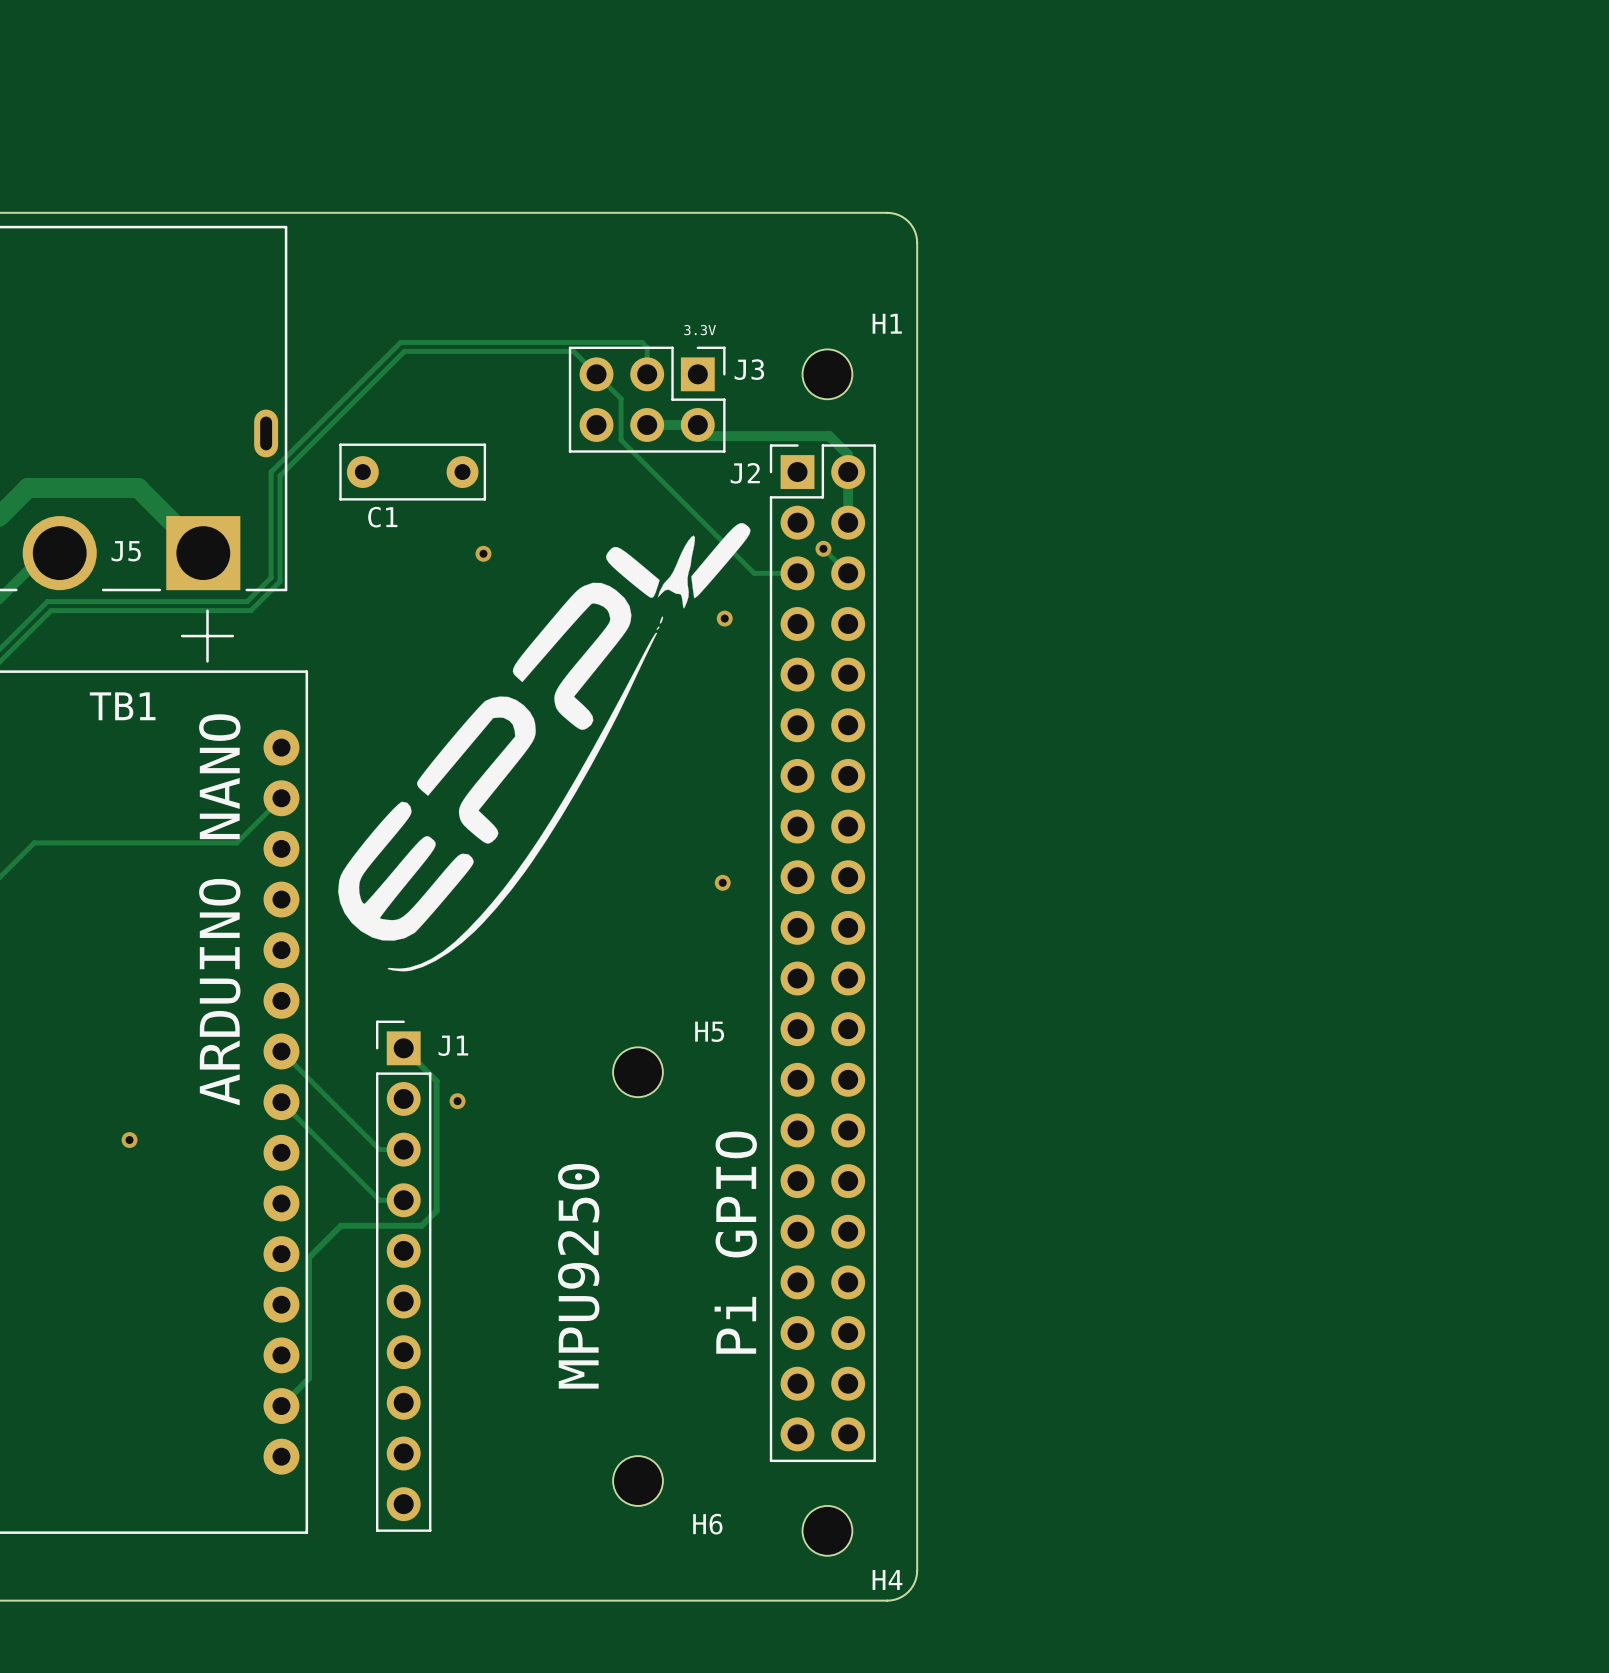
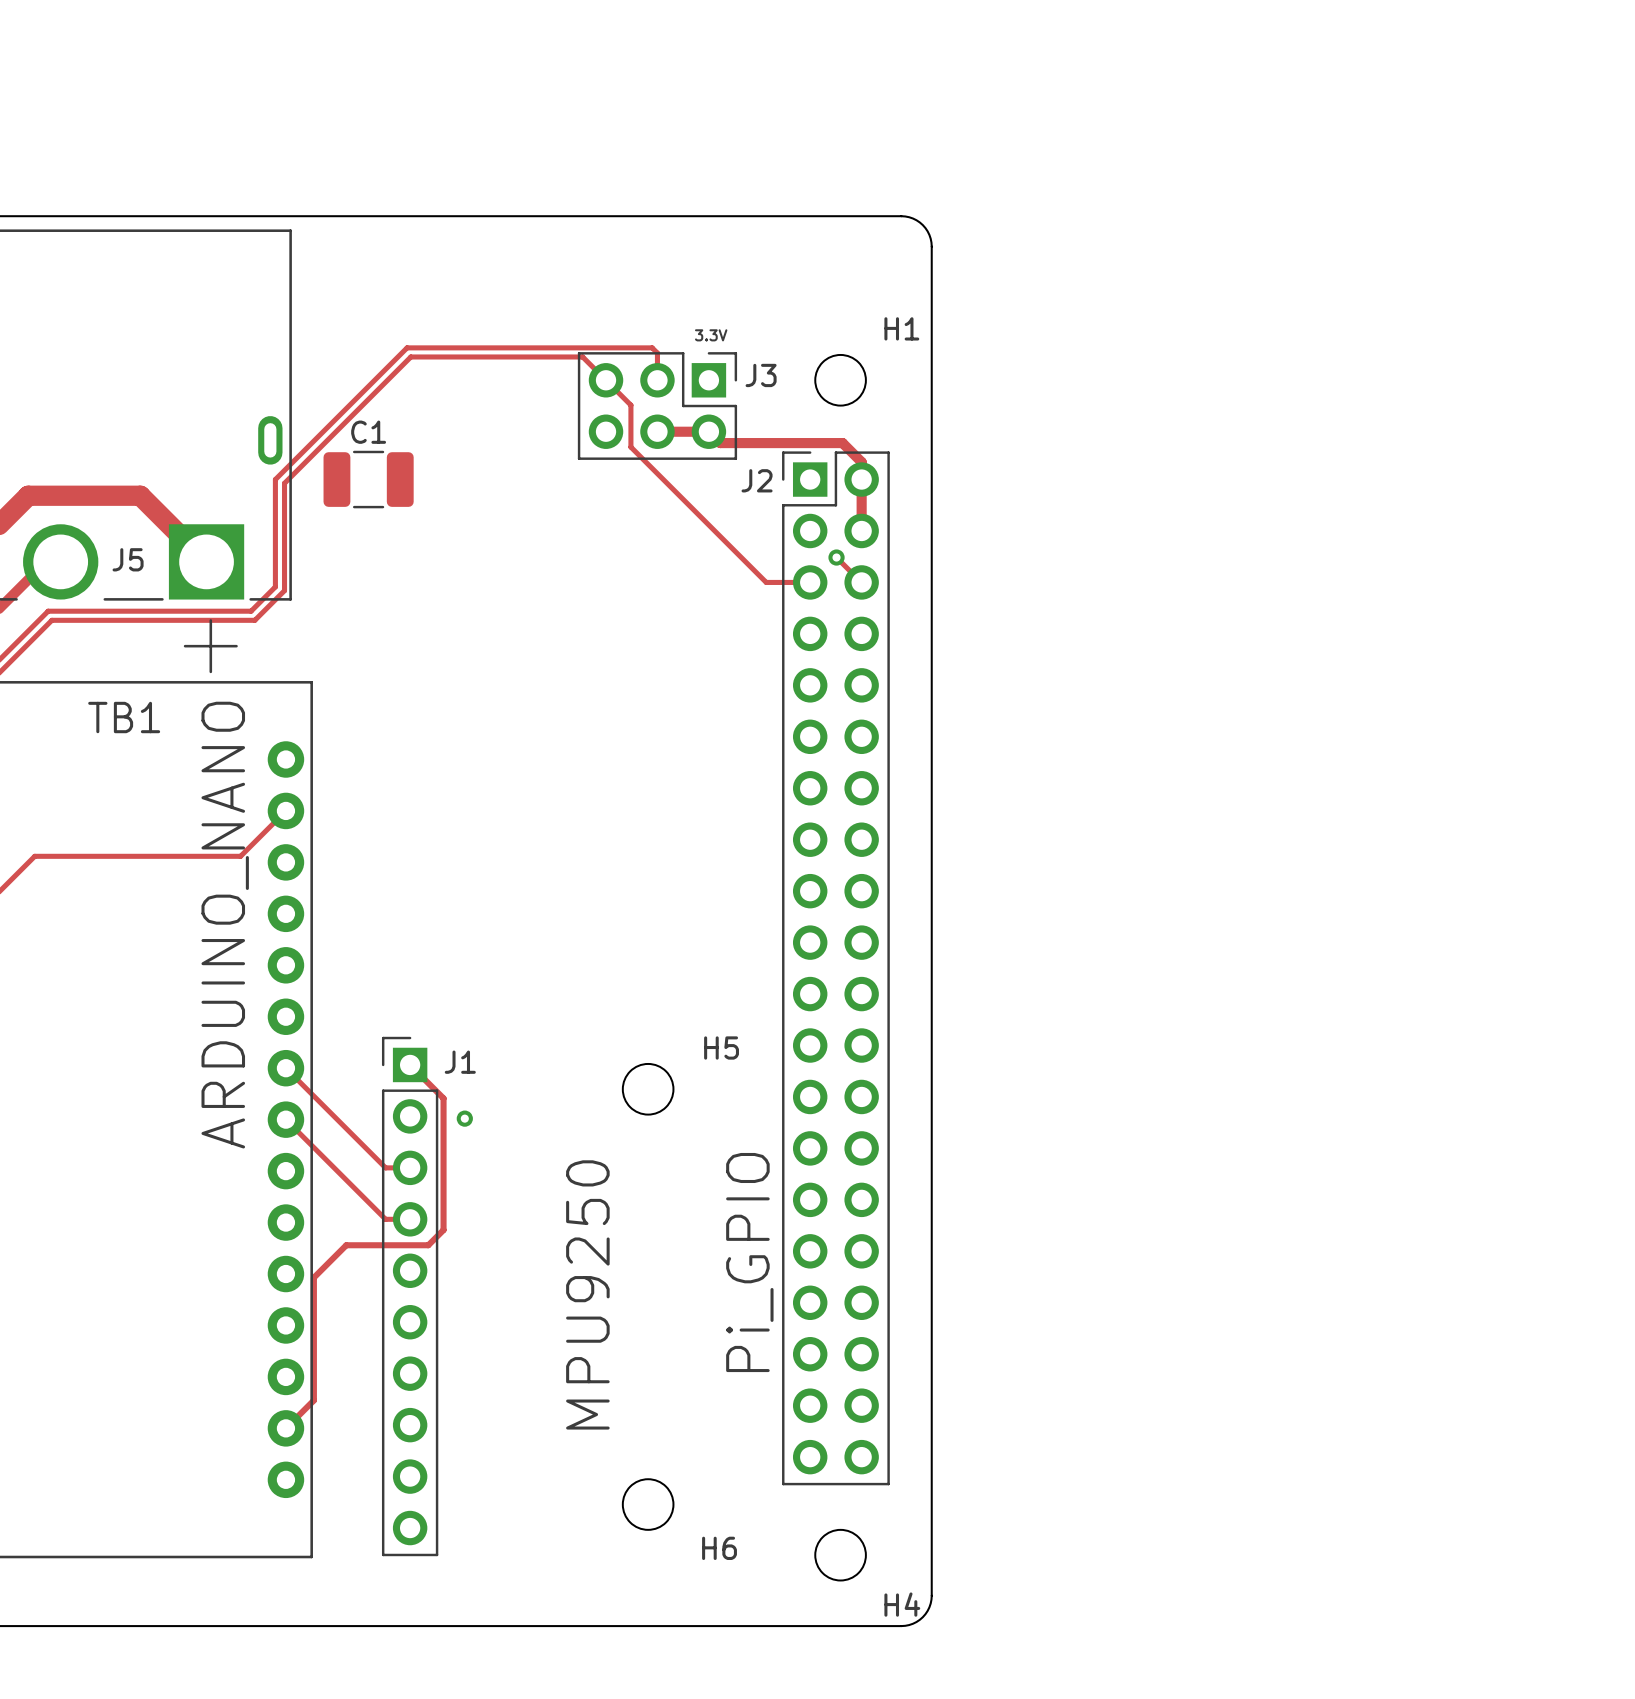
C1 footprint: [339, 443, 487, 501] -> [323, 450, 414, 509]
C1 name position: C1 (382, 517) -> C1 (368, 432)
drawing: [338, 523, 751, 972] -> none
via: (483, 553) -> none
via: (724, 618) -> none
via: (722, 882) -> none
TB1 value: ARDUINO NANO (219, 909) -> ARDUINO_NANO (225, 925)
via: (129, 1140) -> none
J2 value: Pi GPIO (735, 1242) -> Pi_GPIO (749, 1262)

